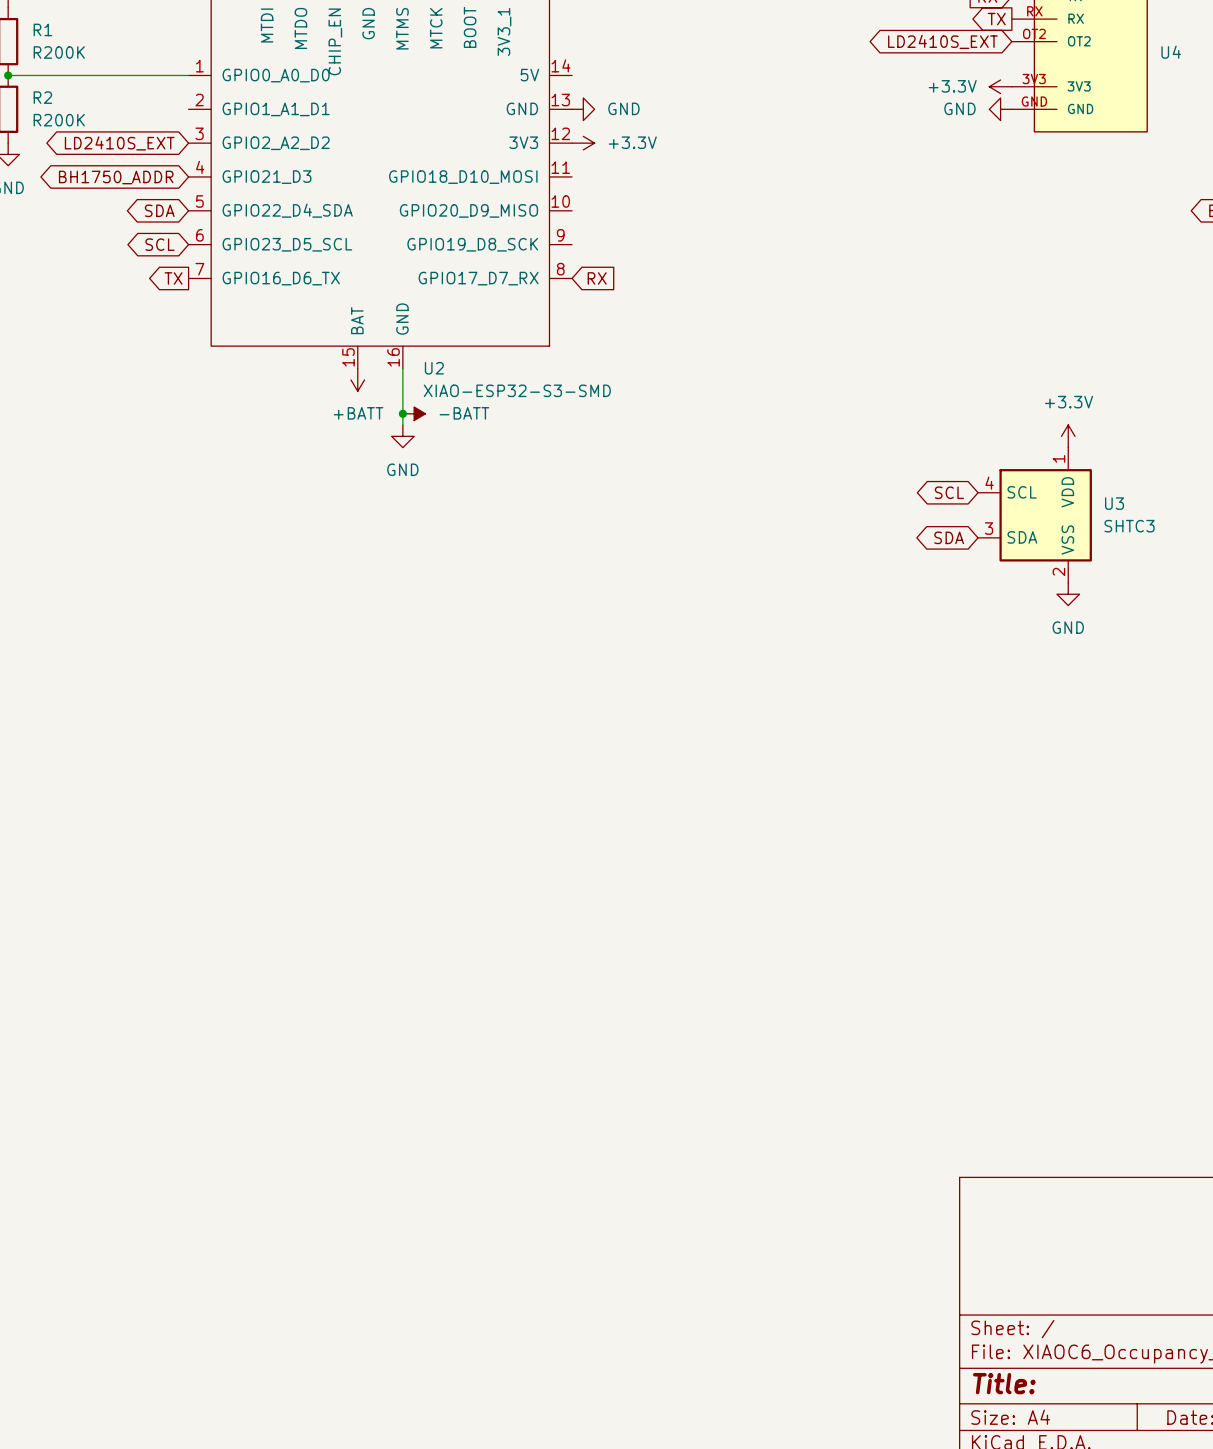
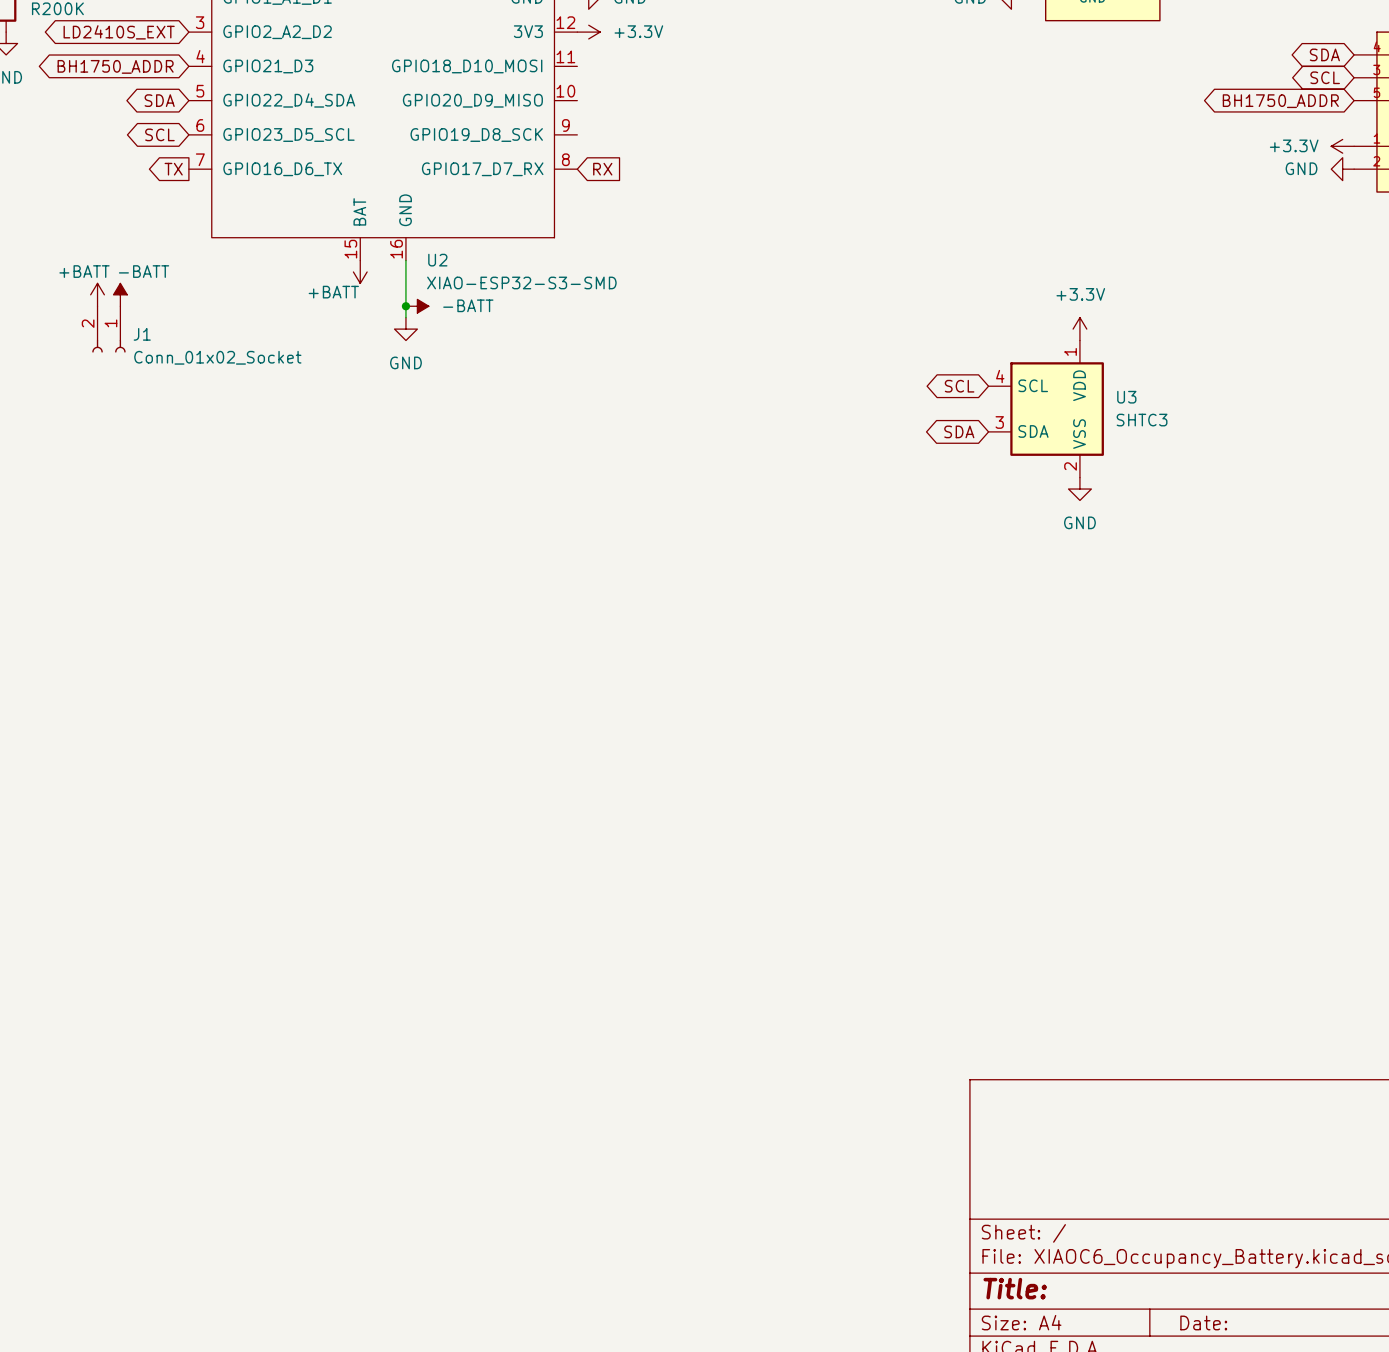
power symbol: none -> +BATT (97, 294)
power symbol: none -> -BATT (120, 294)
power symbol text position: +BATT (358, 413) -> +BATT (333, 292)
J1: none -> Conn_01x02_Socket (108, 329)

